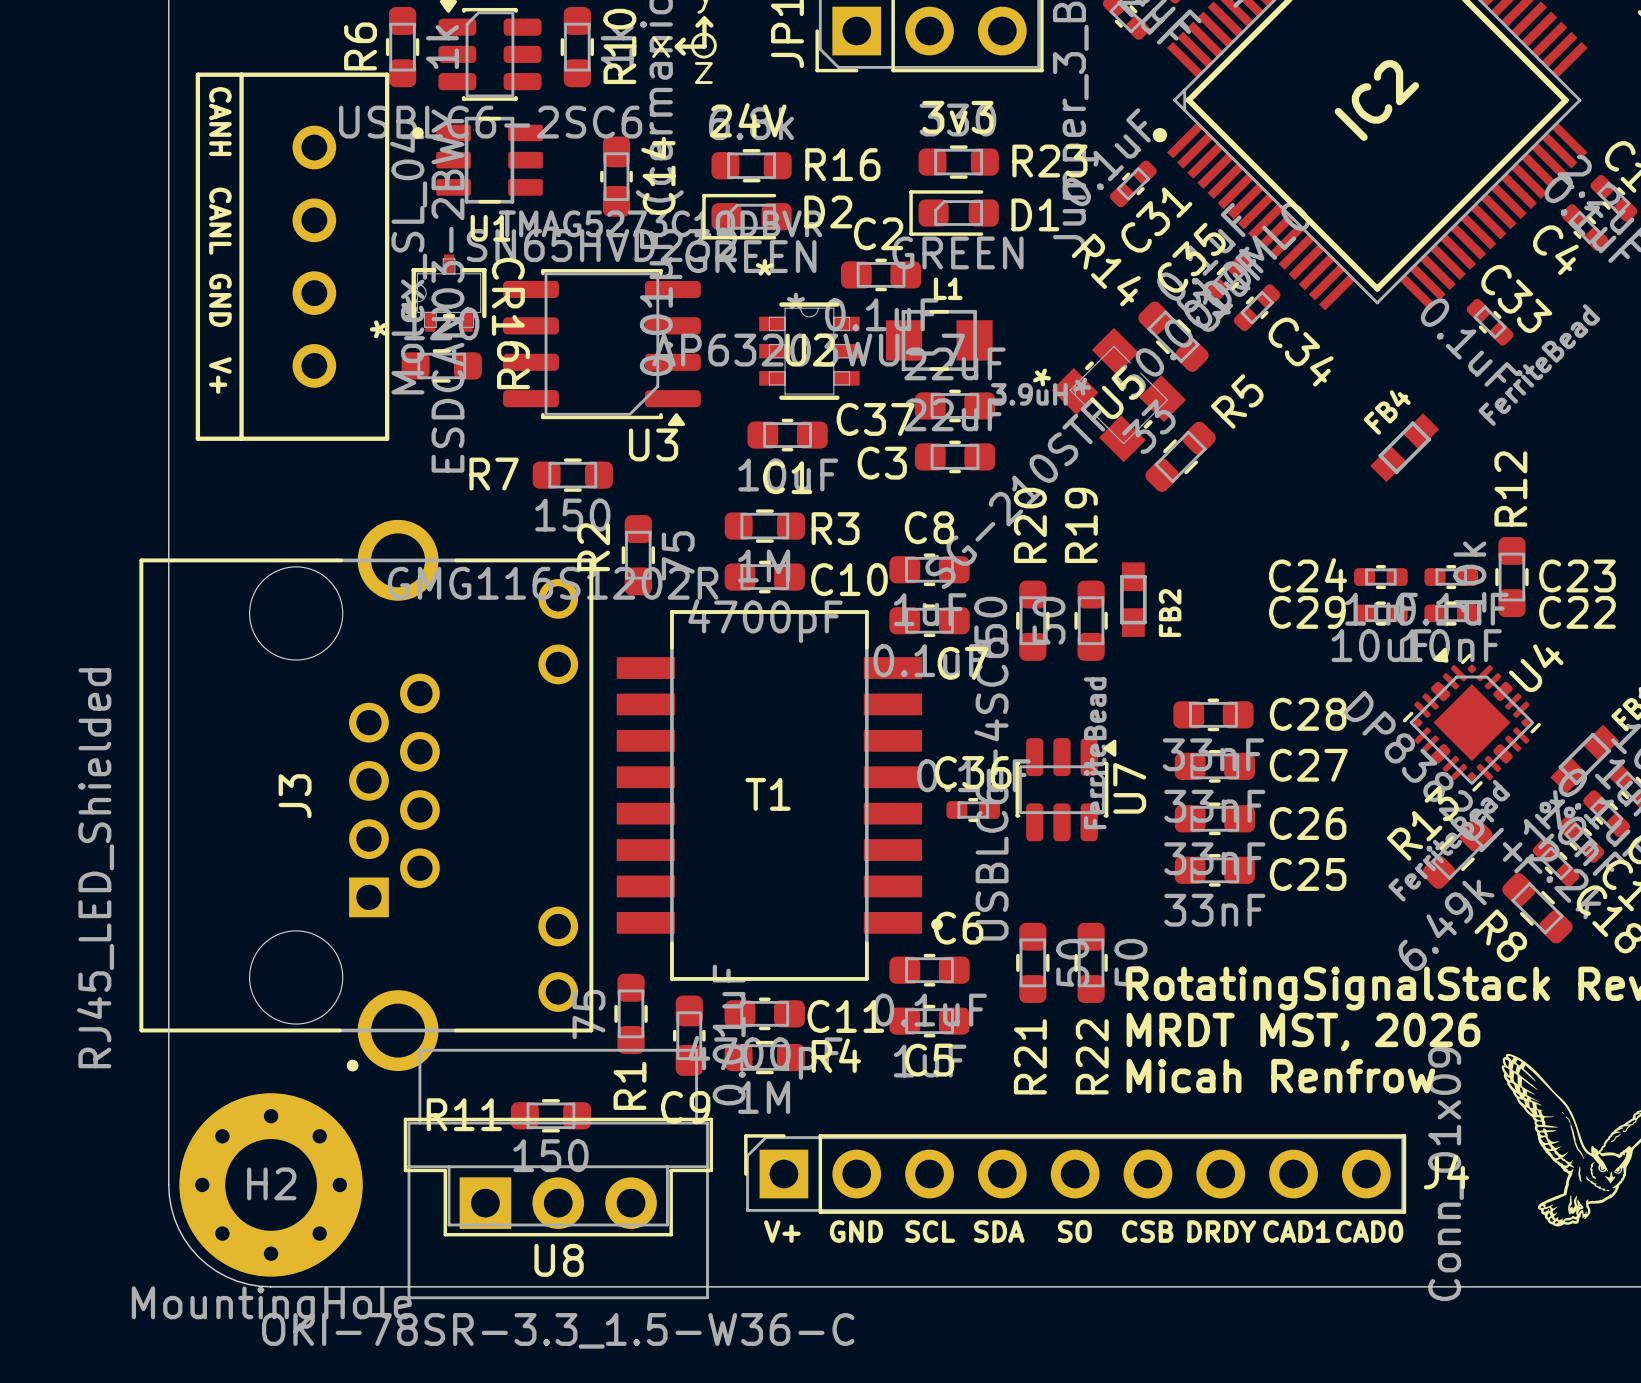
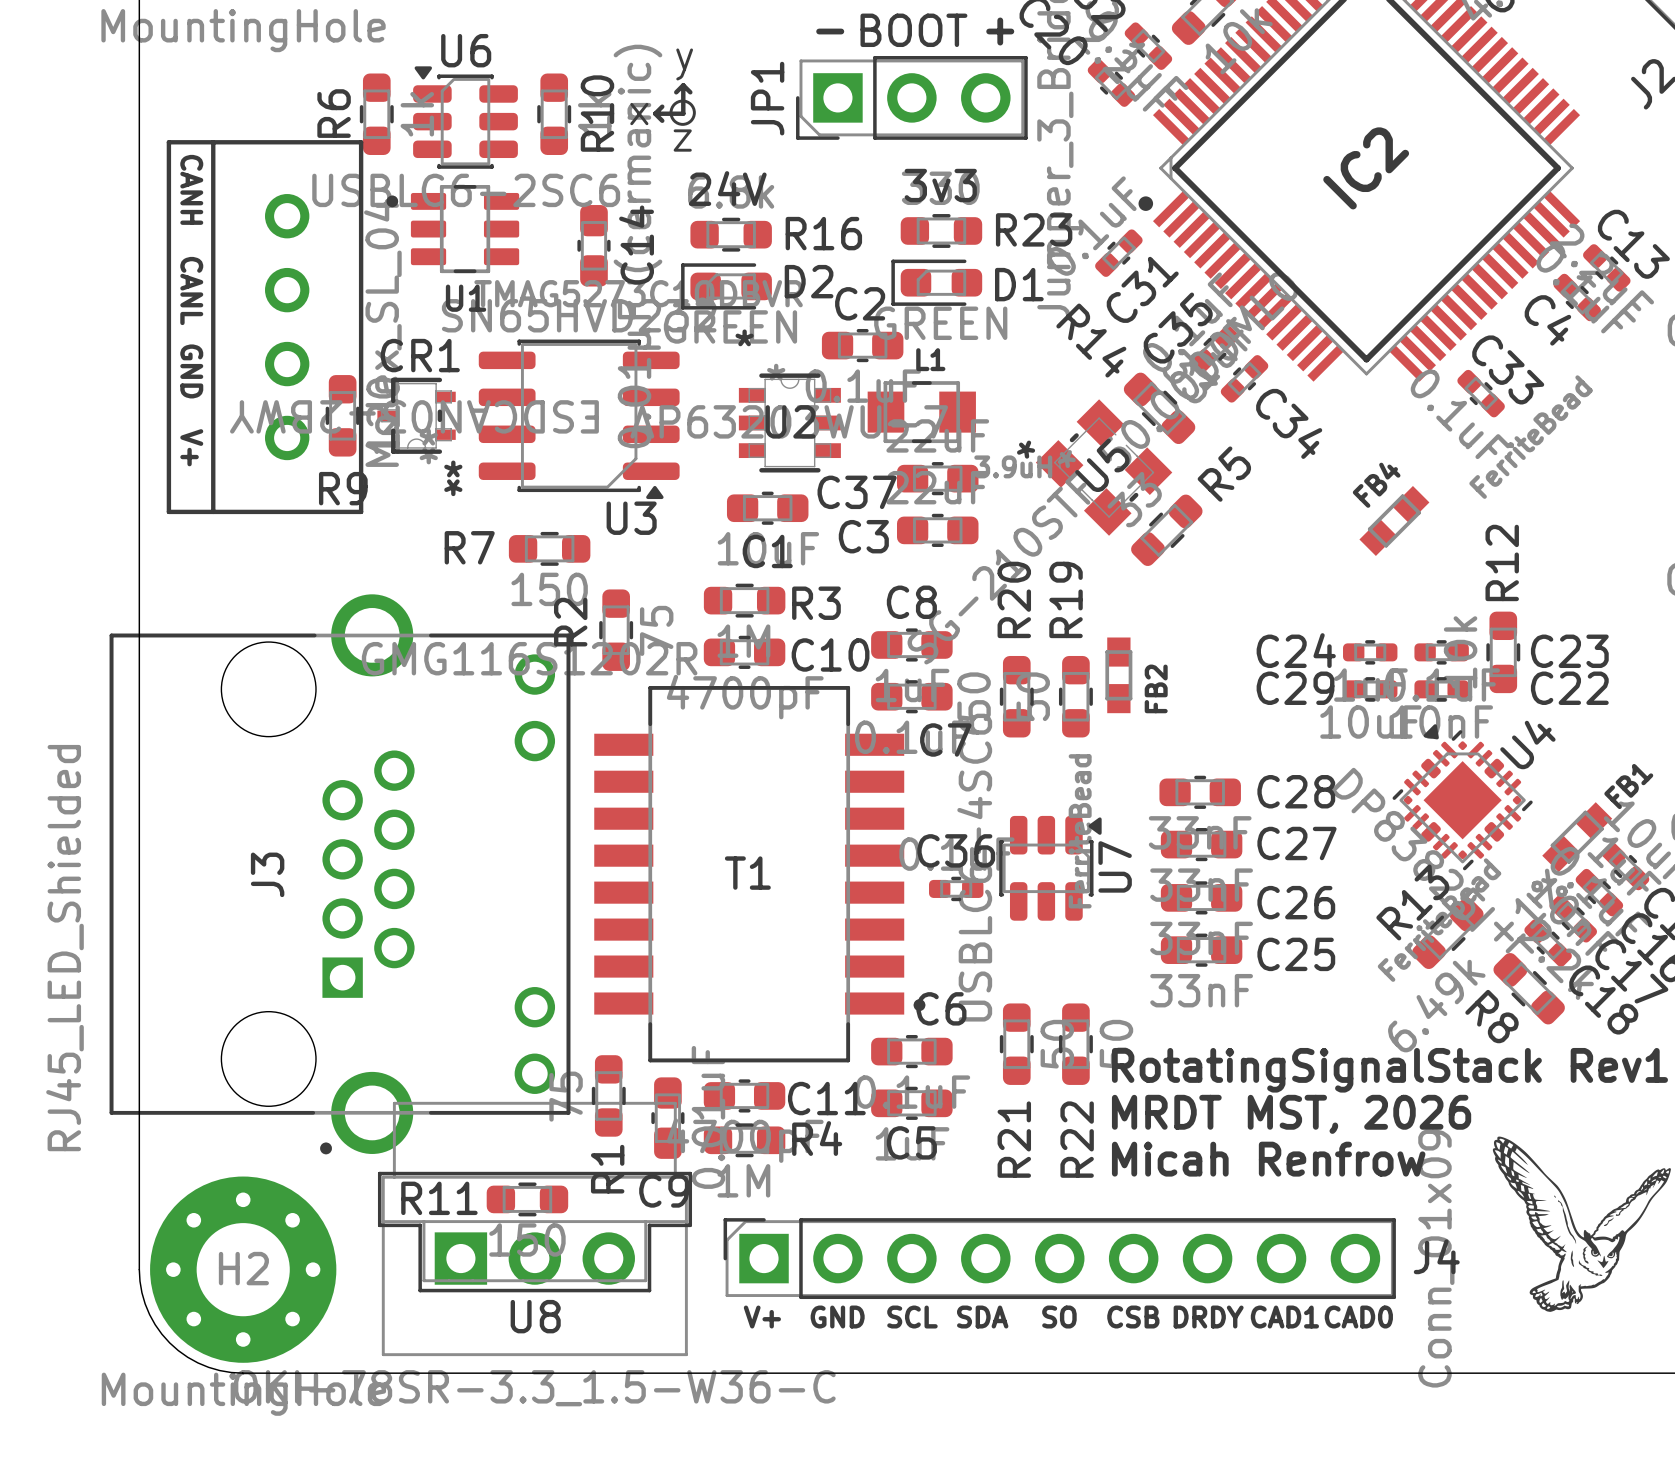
CR1 rotation: 0° (449, 293) -> 90° counterclockwise (416, 415)
CR1 position: (449, 293) -> (416, 415)
R9 rotation: 0° (441, 365) -> 90° clockwise (342, 415)
R9 position: (441, 365) -> (342, 415)
U8 position: (558, 1174) -> (534, 1228)

